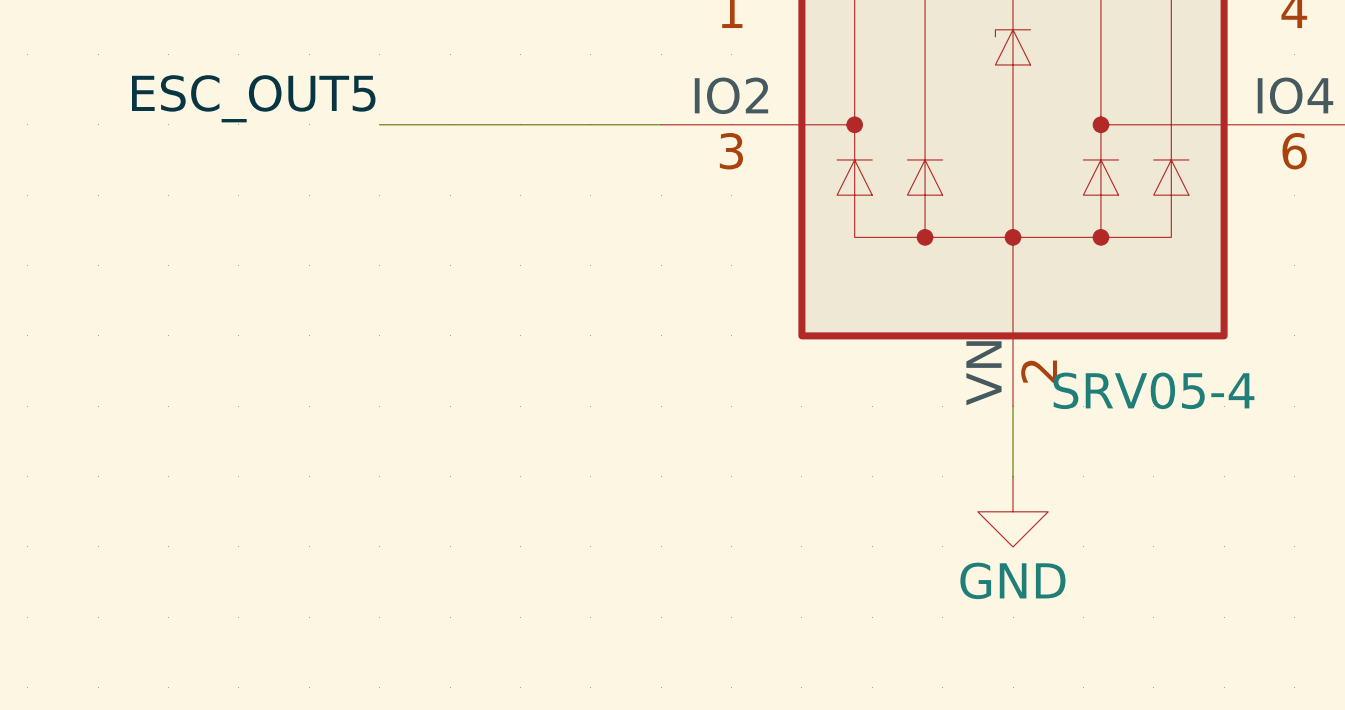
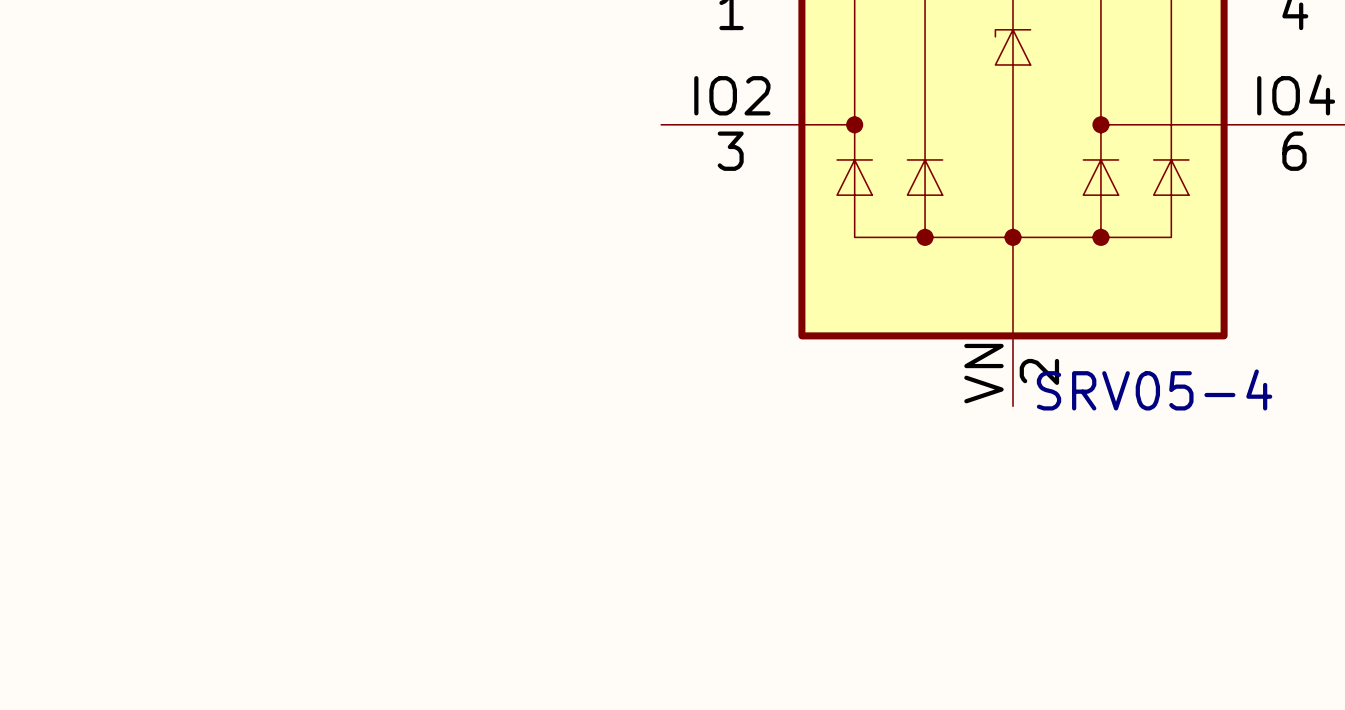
label: ESC_OUT5 (253, 98) -> none
wire: (379, 124) (661, 124) -> none
wire: (1013, 406) (1013, 476) -> none
power symbol: GND (1013, 511) -> none

